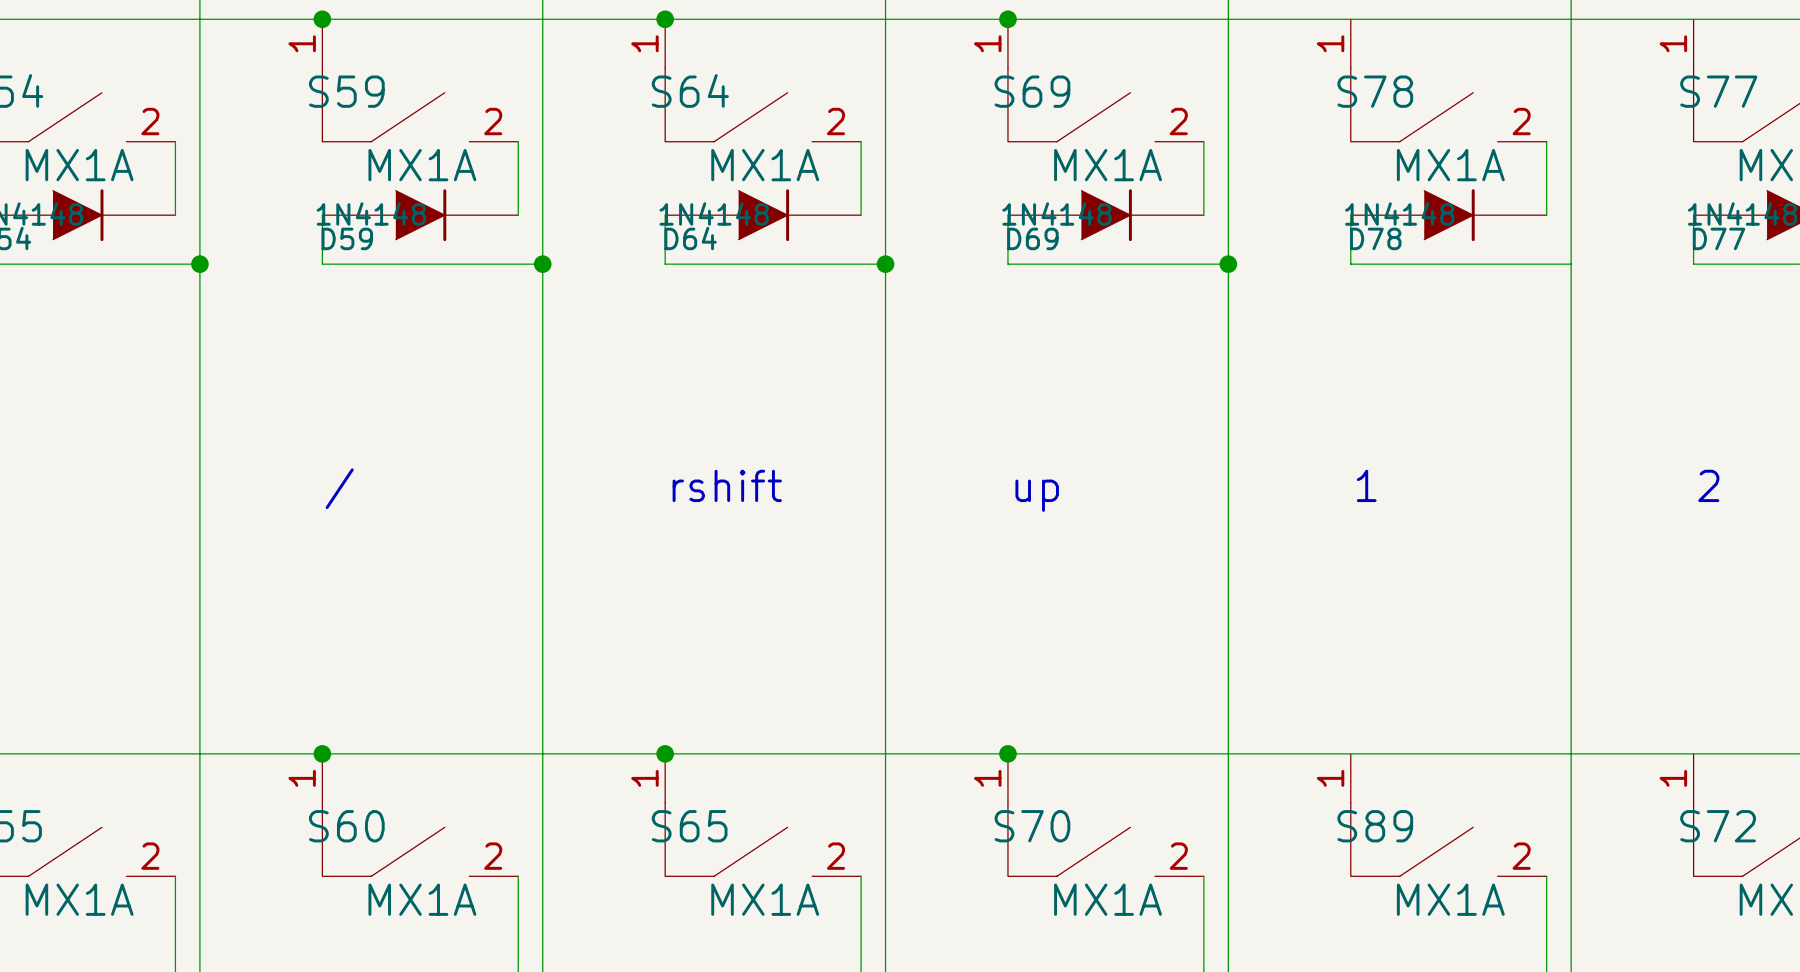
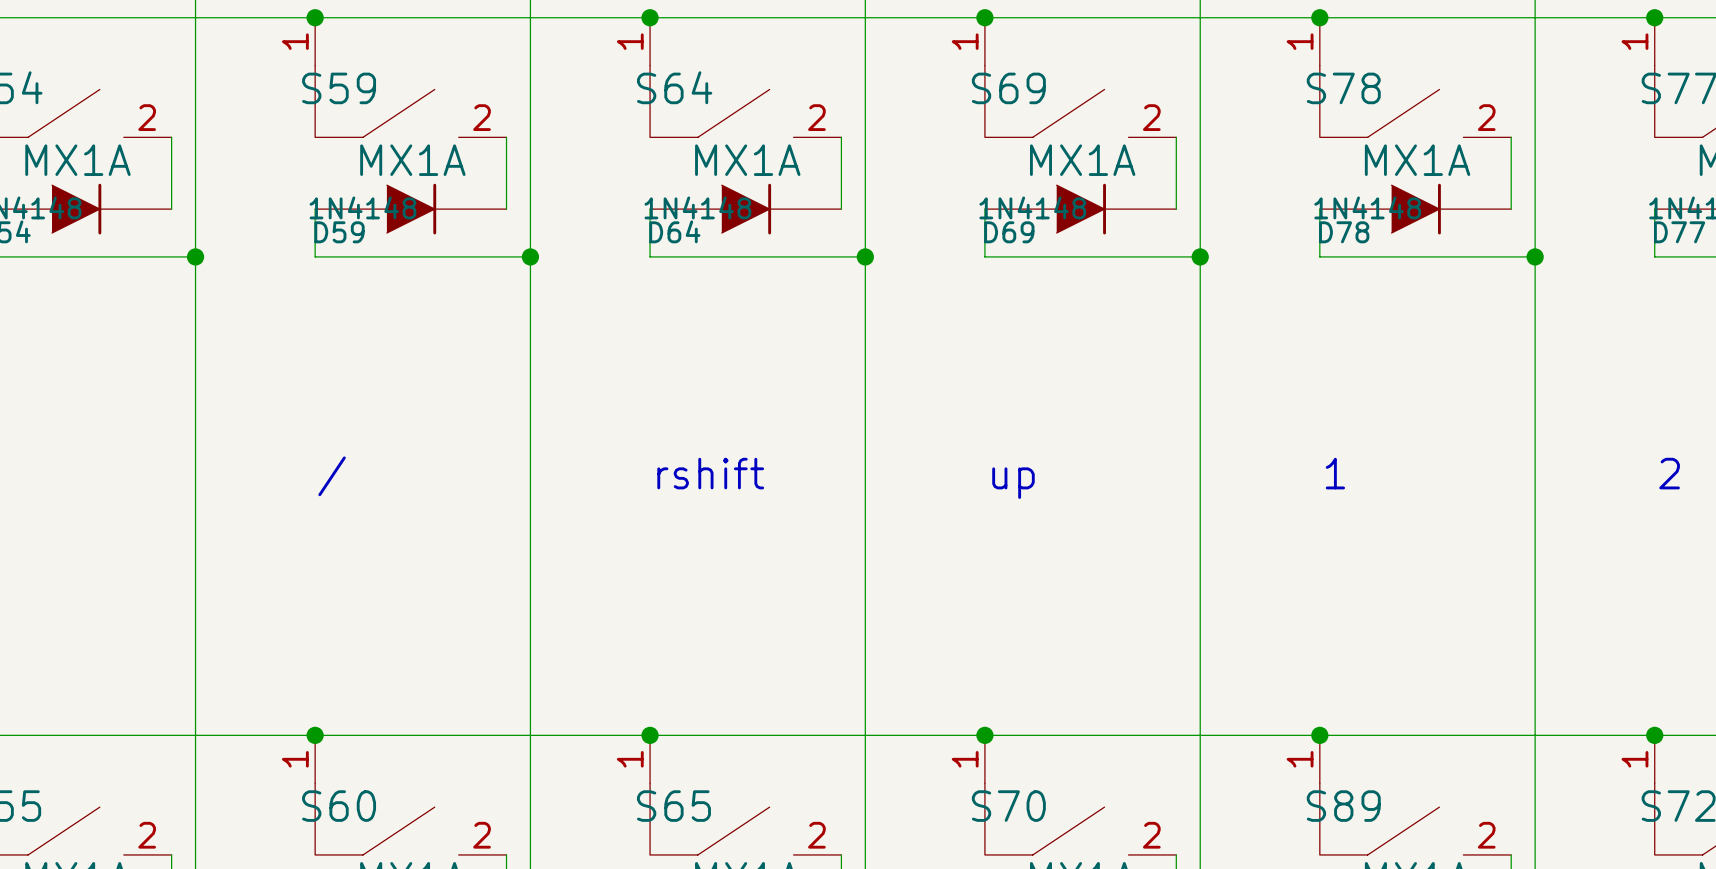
junction: none -> (1319, 17)
junction: none -> (1654, 17)
junction: none -> (1535, 256)
junction: none -> (1319, 735)
junction: none -> (1654, 735)

